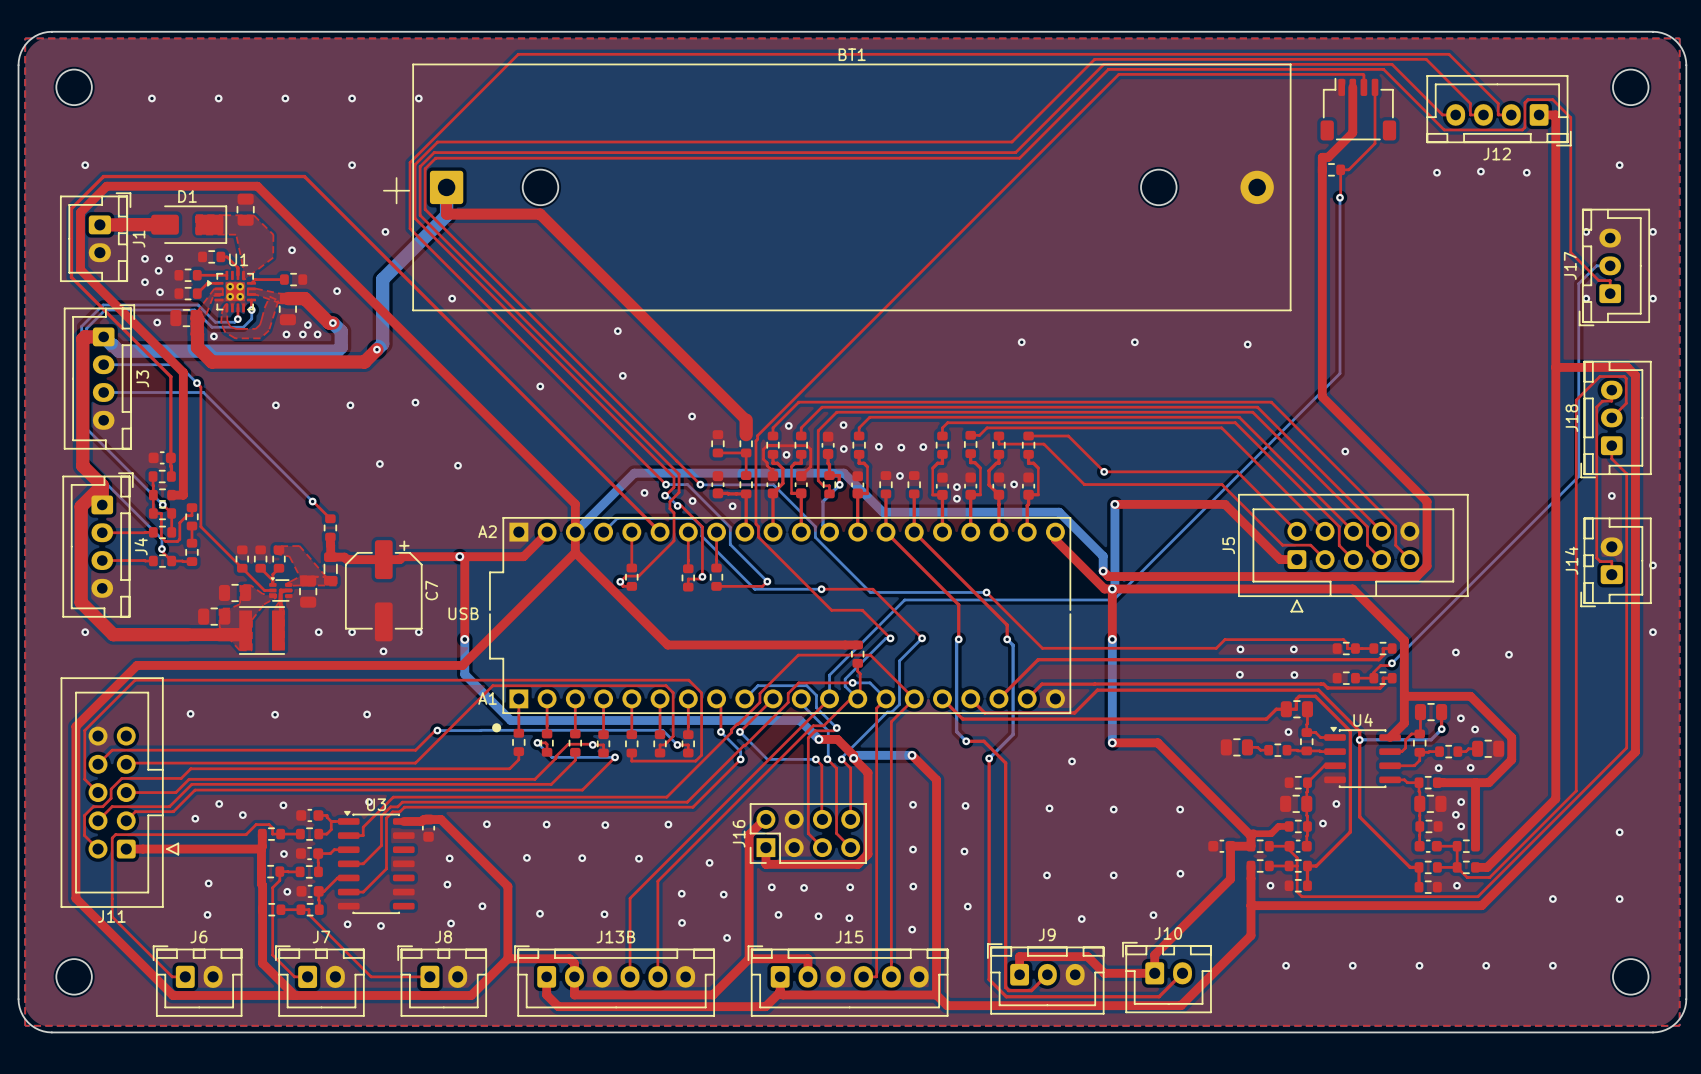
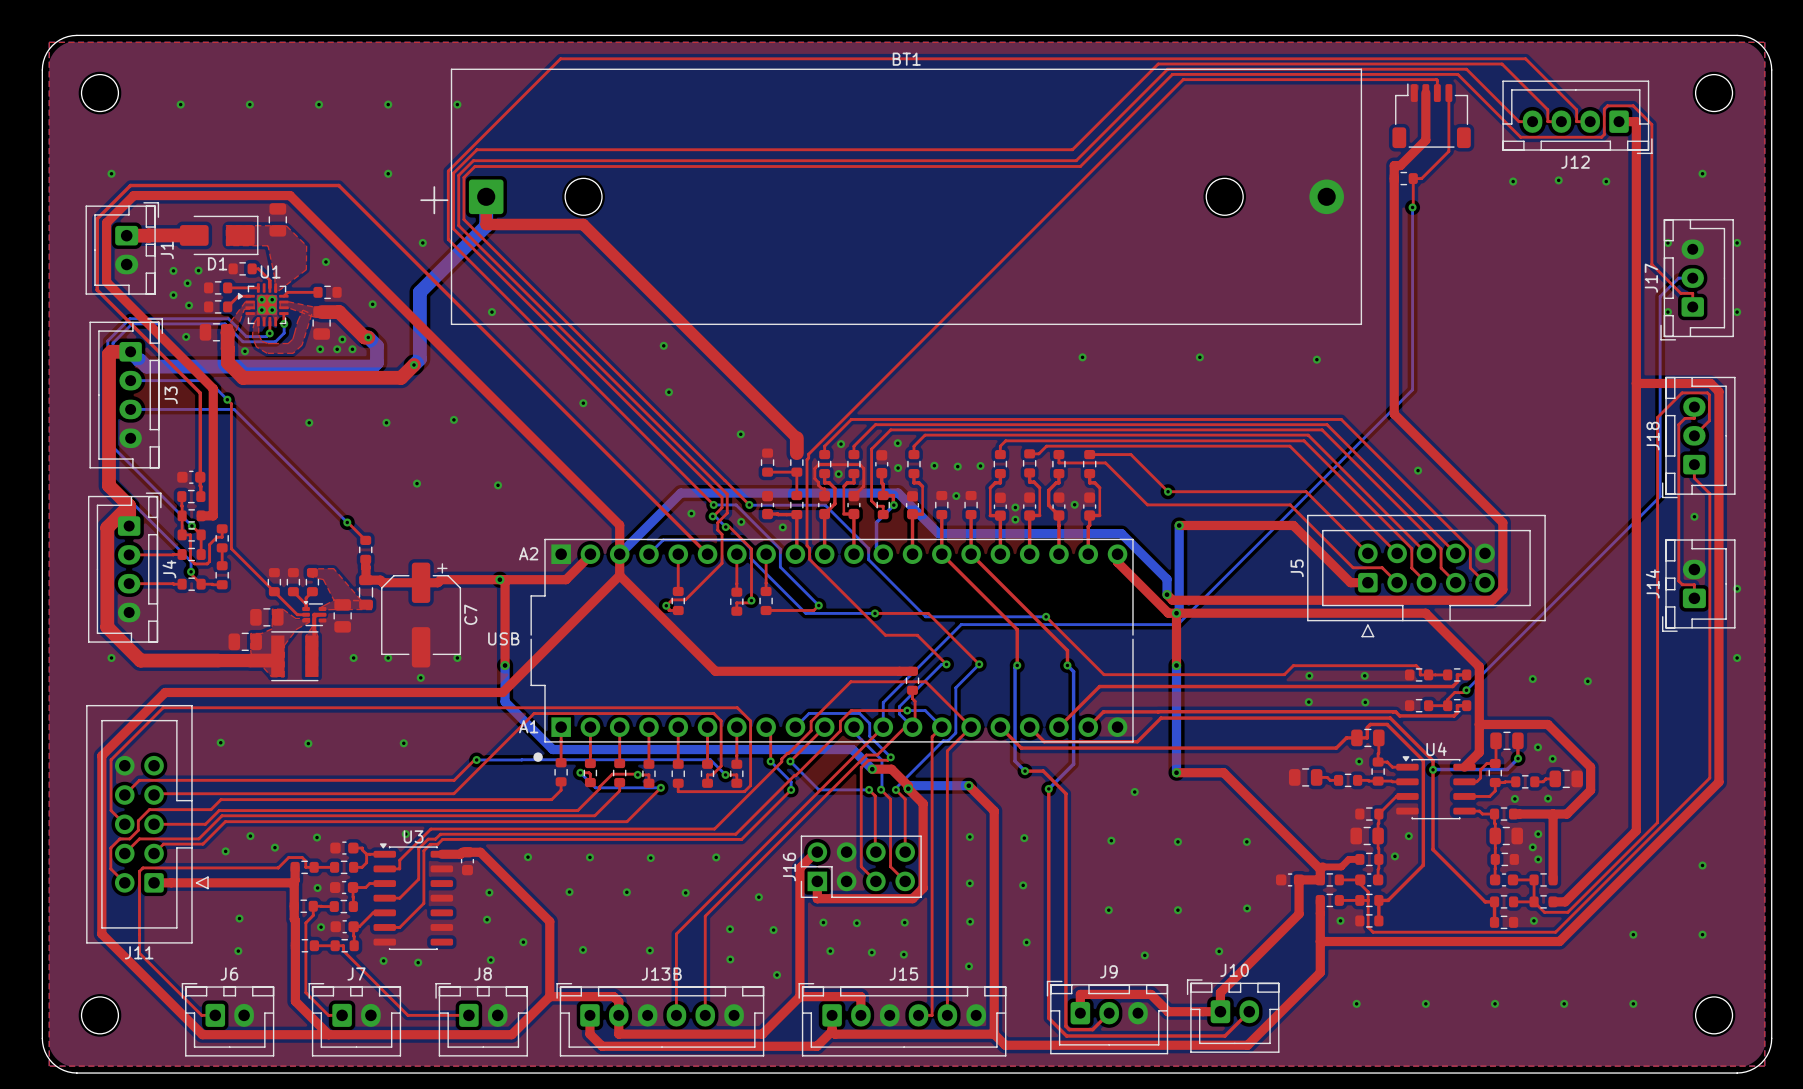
D1 name position: D1 (187, 196) -> D1 (217, 263)

